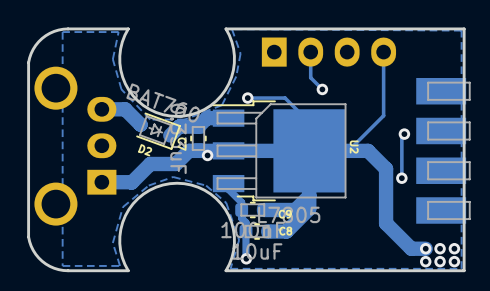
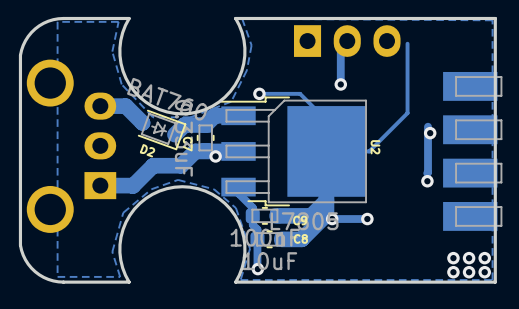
part footprint: [261, 37, 397, 67] -> [293, 25, 401, 57]
track: (310, 52) (310, 77) (322, 89) -> (347, 41) (340, 47) (340, 84)
track: none -> (428, 126) (427, 173)
track: (404, 134) (401, 136) (401, 178) -> none
track: (235, 150) (368, 150) (386, 168) (386, 223) (411, 248) (425, 248) -> none
via: none -> (332, 219)
track: none -> (367, 219) (332, 219)
via: none -> (367, 219)

